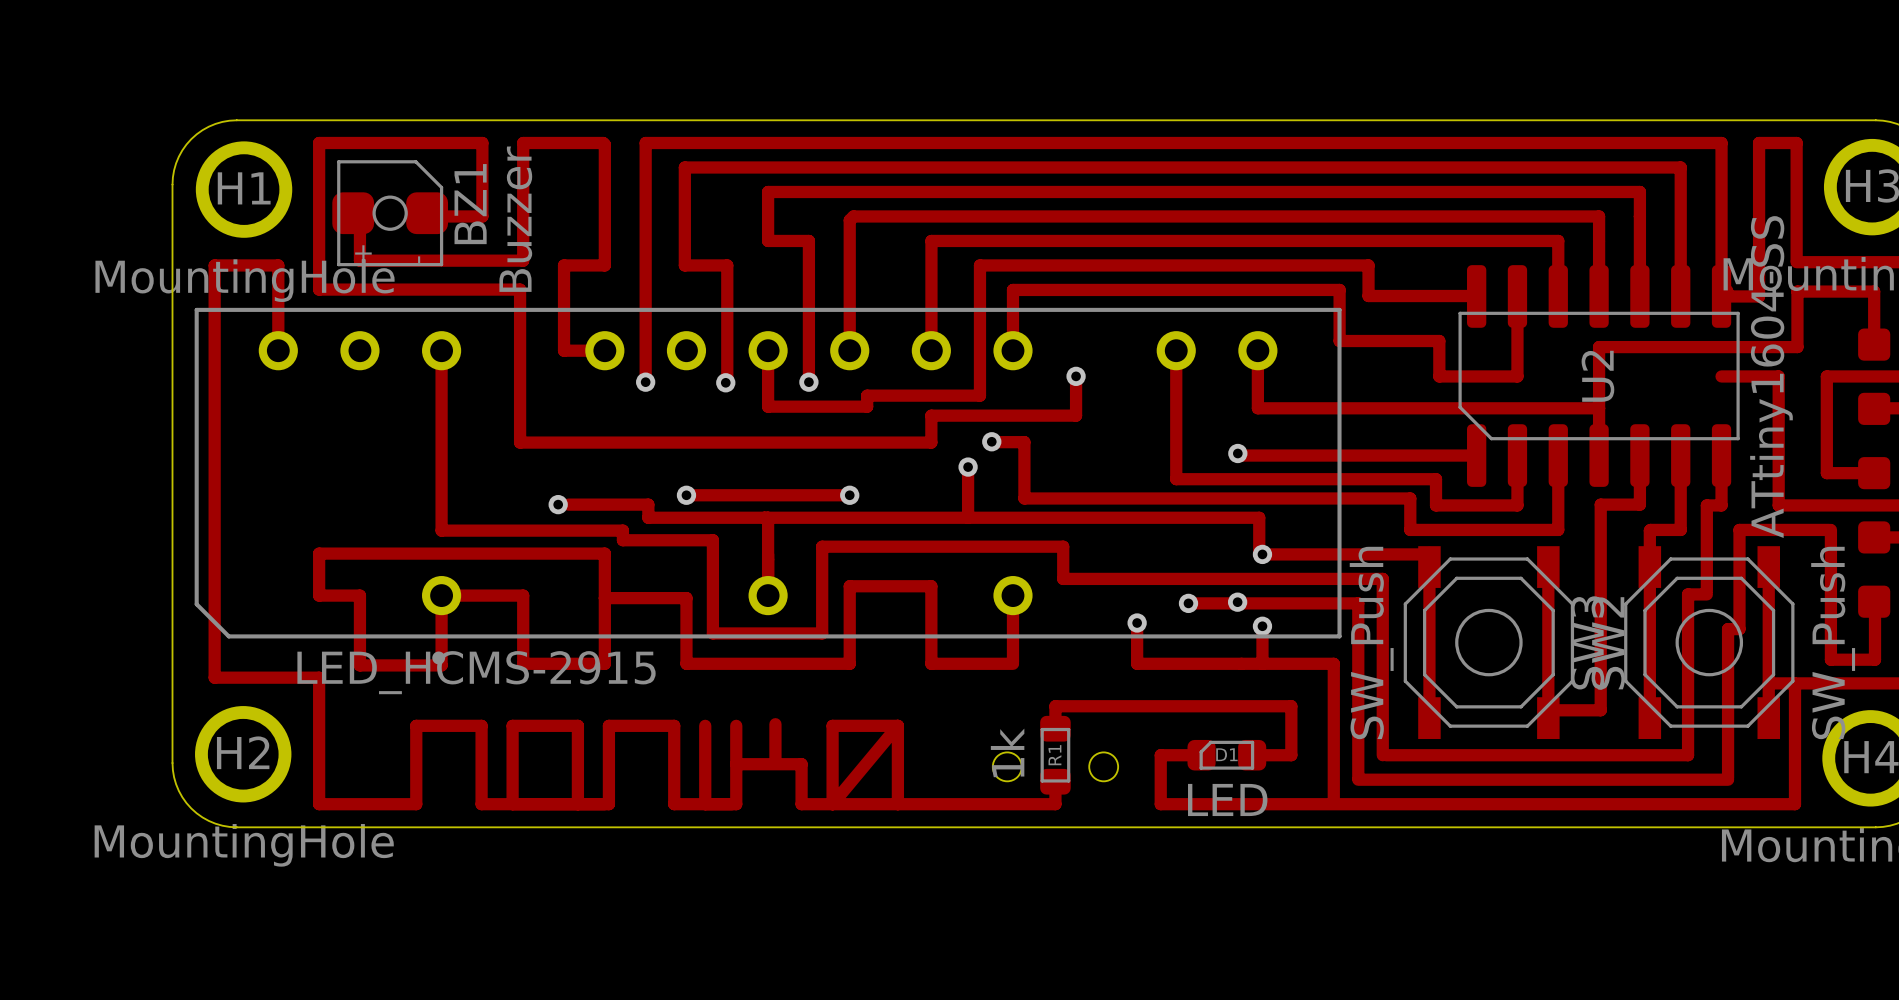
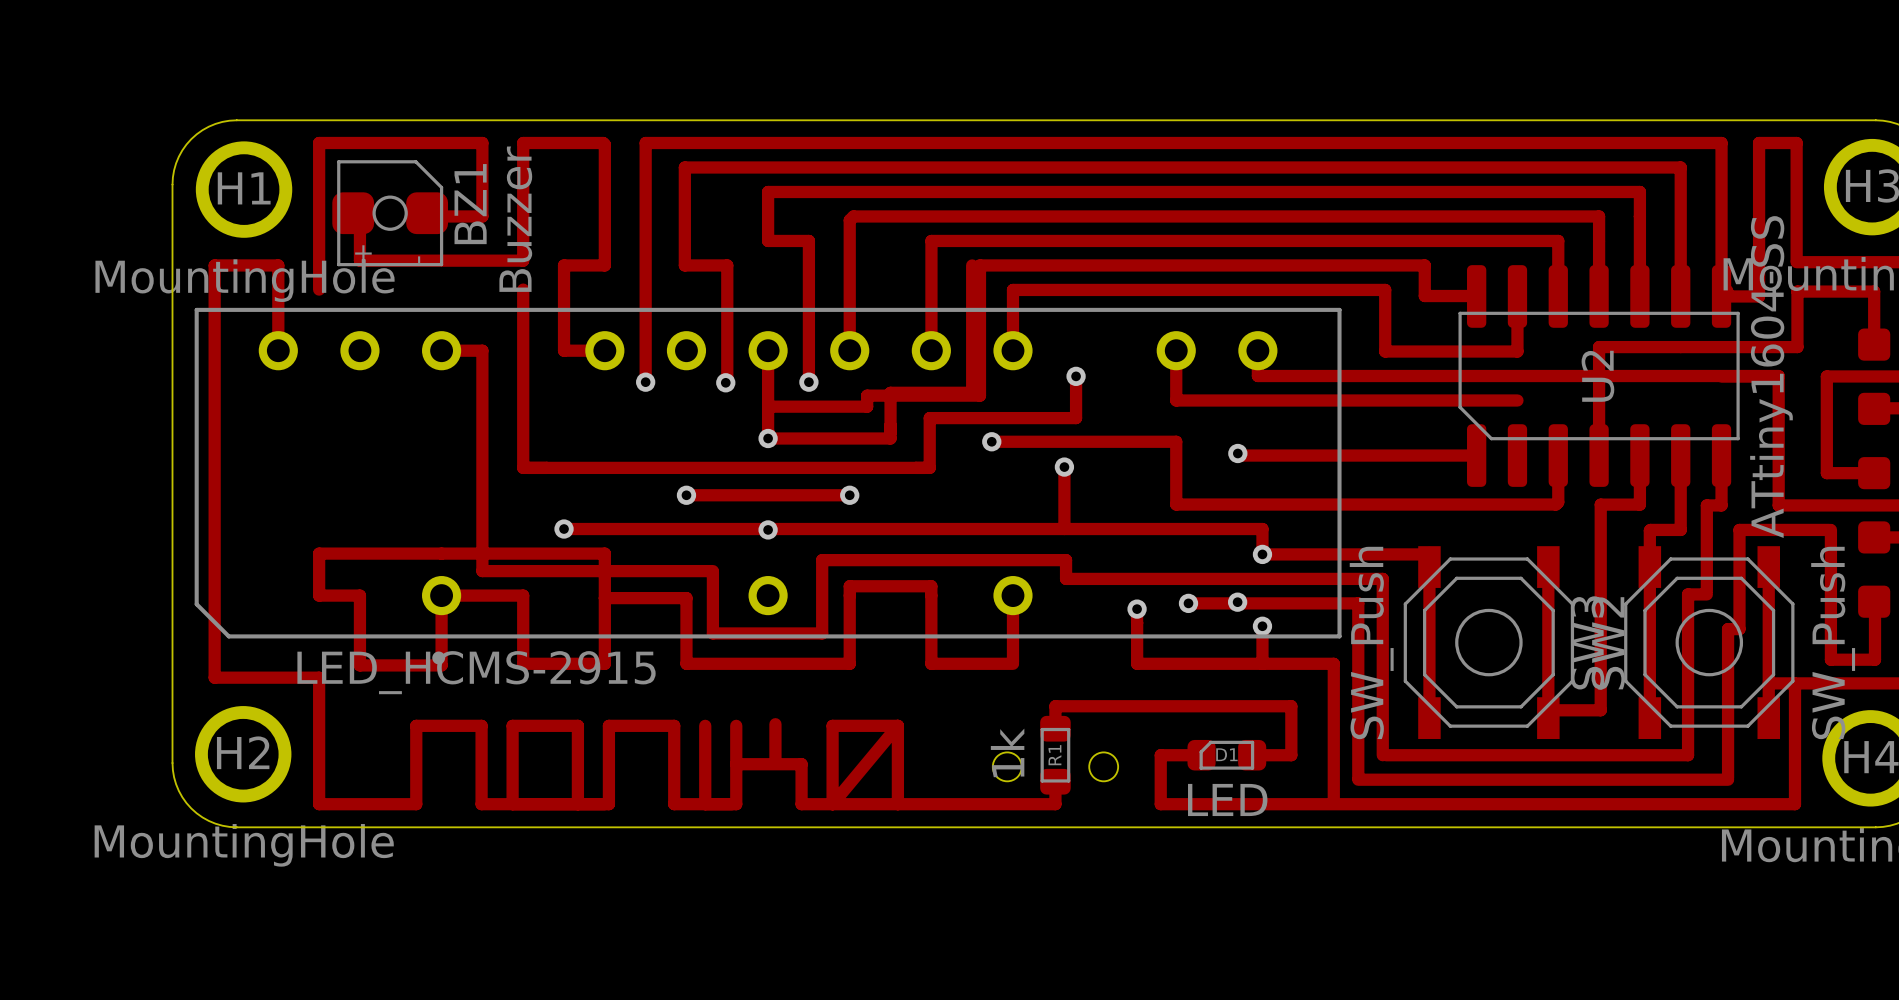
track: none -> (972, 265) (972, 392) (890, 392) (890, 438) (768, 438)
track: (1368, 265) (1368, 296) (1424, 296) -> (1368, 265) (1424, 265) (1424, 296)
track: (319, 289) (520, 289) (520, 442) (931, 442) (931, 415) (1076, 415) -> (523, 289) (523, 467) (929, 467) (929, 418) (1076, 418) (1076, 415)
track: (1339, 289) (1339, 341) (1439, 341) (1439, 376) (1517, 376) (1517, 351) -> (1339, 289) (1385, 289) (1385, 351) (1517, 351)
track: (441, 350) (441, 530) (622, 530) (622, 540) (712, 540) (712, 572) -> (441, 350) (482, 350) (482, 571) (712, 571)
track: (1257, 376) (1257, 408) (1599, 408) -> (1257, 376) (1778, 376)
track: (1176, 400) (1176, 441) -> (991, 441) (1176, 441)
track: none -> (1176, 400) (1517, 400)
track: none -> (768, 406) (768, 432)
via: none -> (768, 438)
track: (992, 442) (1024, 442) (1024, 498) (1410, 498) (1410, 529) (1558, 529) (1558, 502) -> none
track: (1517, 455) (1517, 505) (1436, 505) (1436, 479) (1176, 479) -> (1558, 502) (1555, 504) (1176, 504) (1176, 479)
via: (968, 467) -> none
track: none -> (1064, 467) (1064, 529)
via: none -> (1064, 467)
track: (968, 468) (968, 517) -> none
via position: (558, 504) -> (564, 529)
track: (568, 504) (648, 504) (648, 517) (1259, 517) (1259, 554) (1262, 554) -> (564, 529) (1262, 529) (1262, 554)
track: (768, 517) (768, 595) -> none
via: none -> (768, 529)
track: (822, 560) (822, 546) (1063, 546) (1063, 578) (1066, 578) -> (822, 560) (1066, 560) (1066, 578)
via position: (1137, 622) -> (1137, 609)

